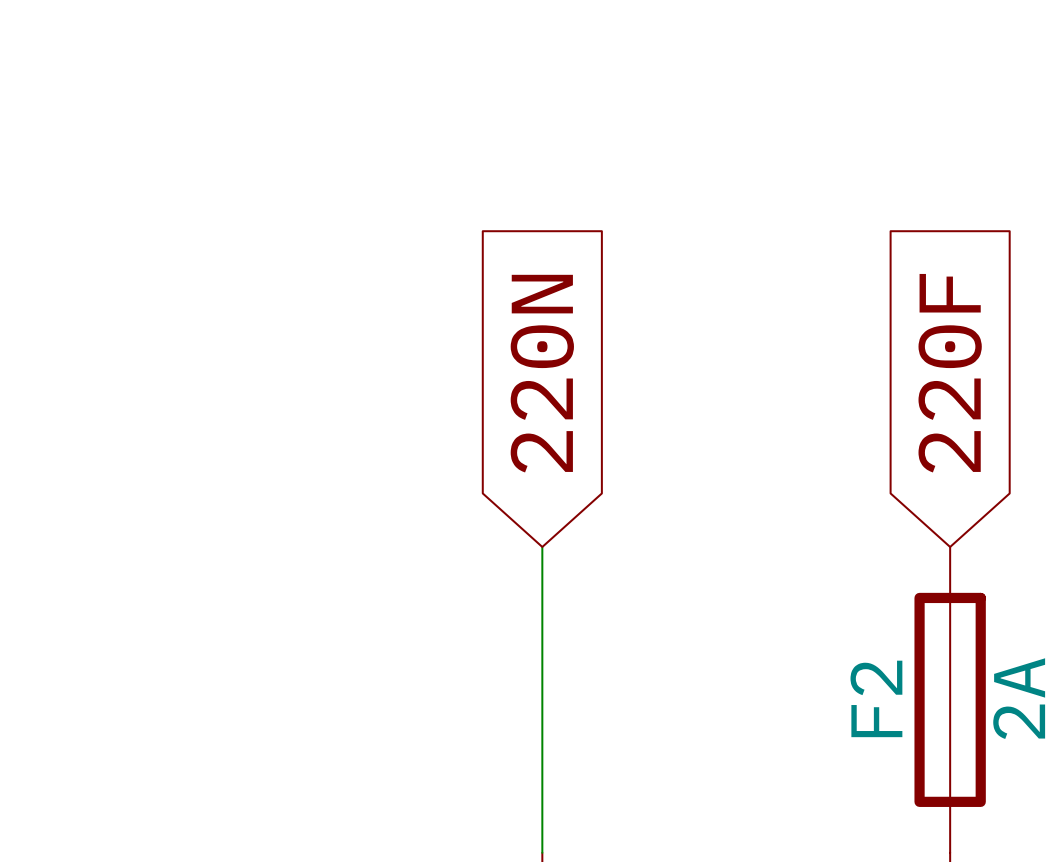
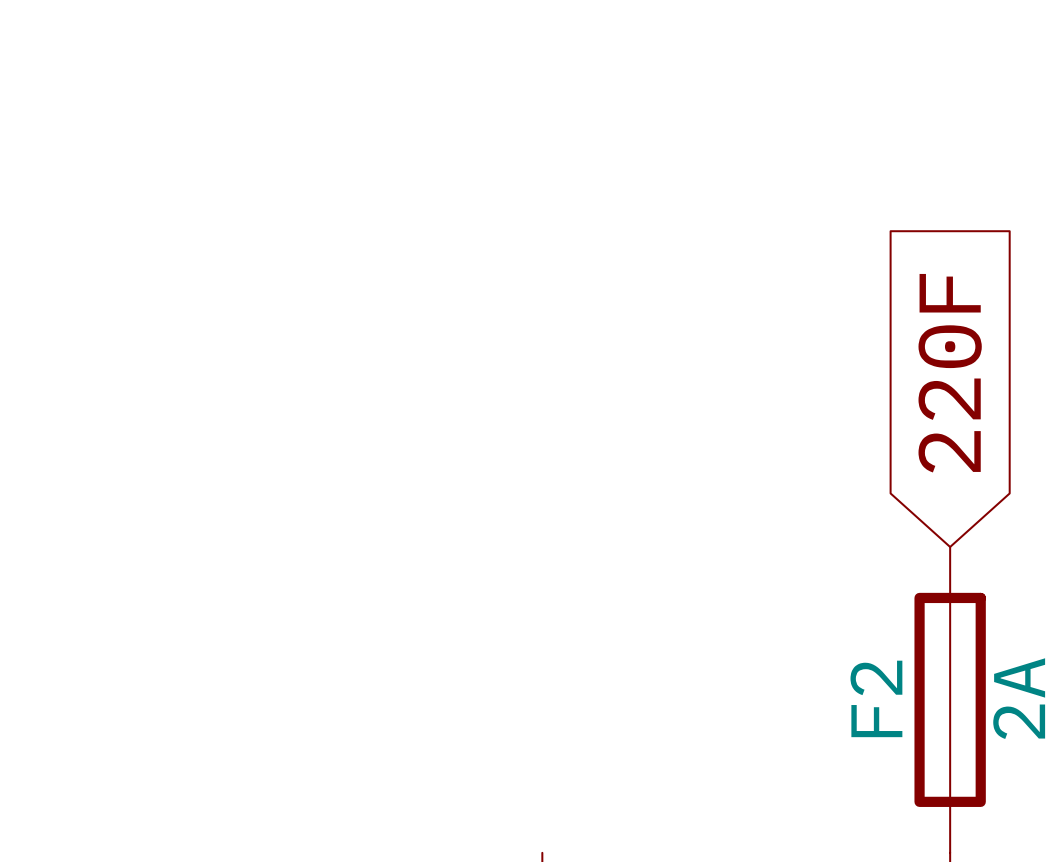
global label: 220N (542, 373) -> none
wire: (542, 546) (542, 852) -> none

